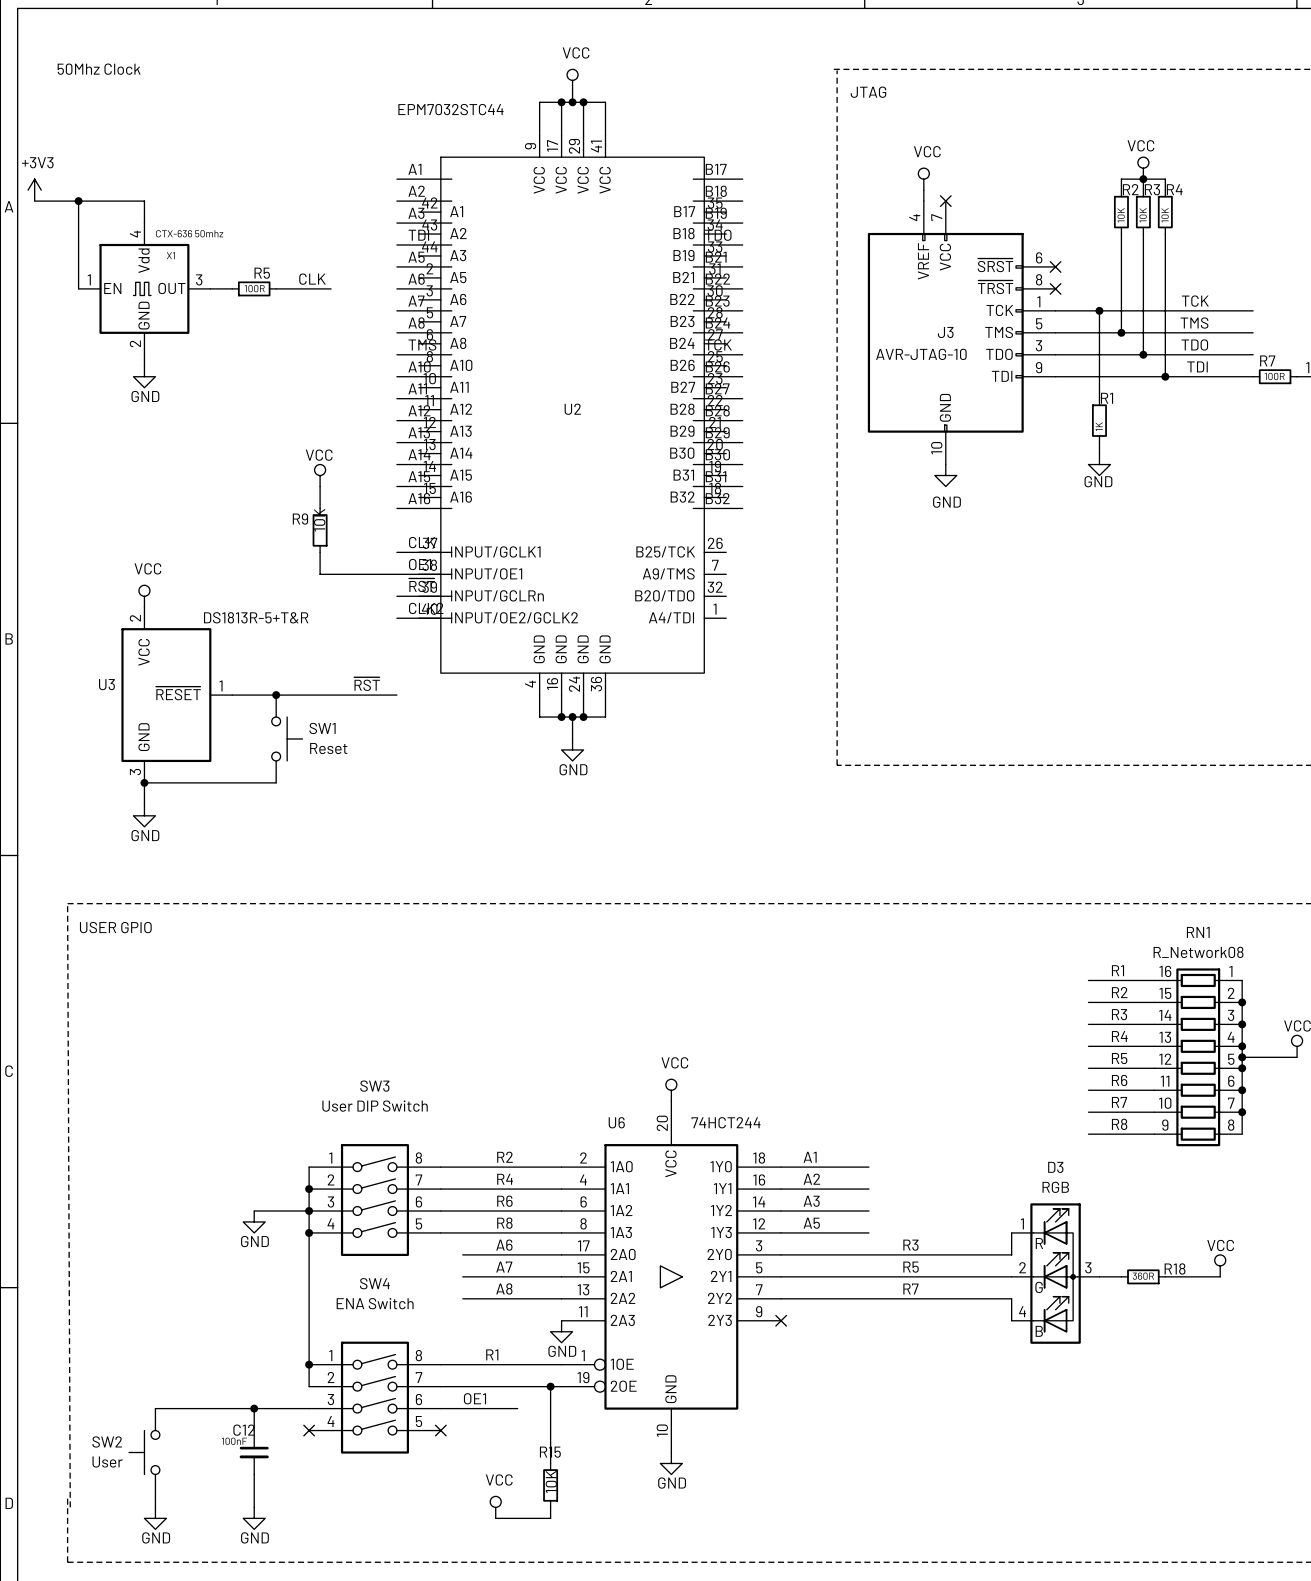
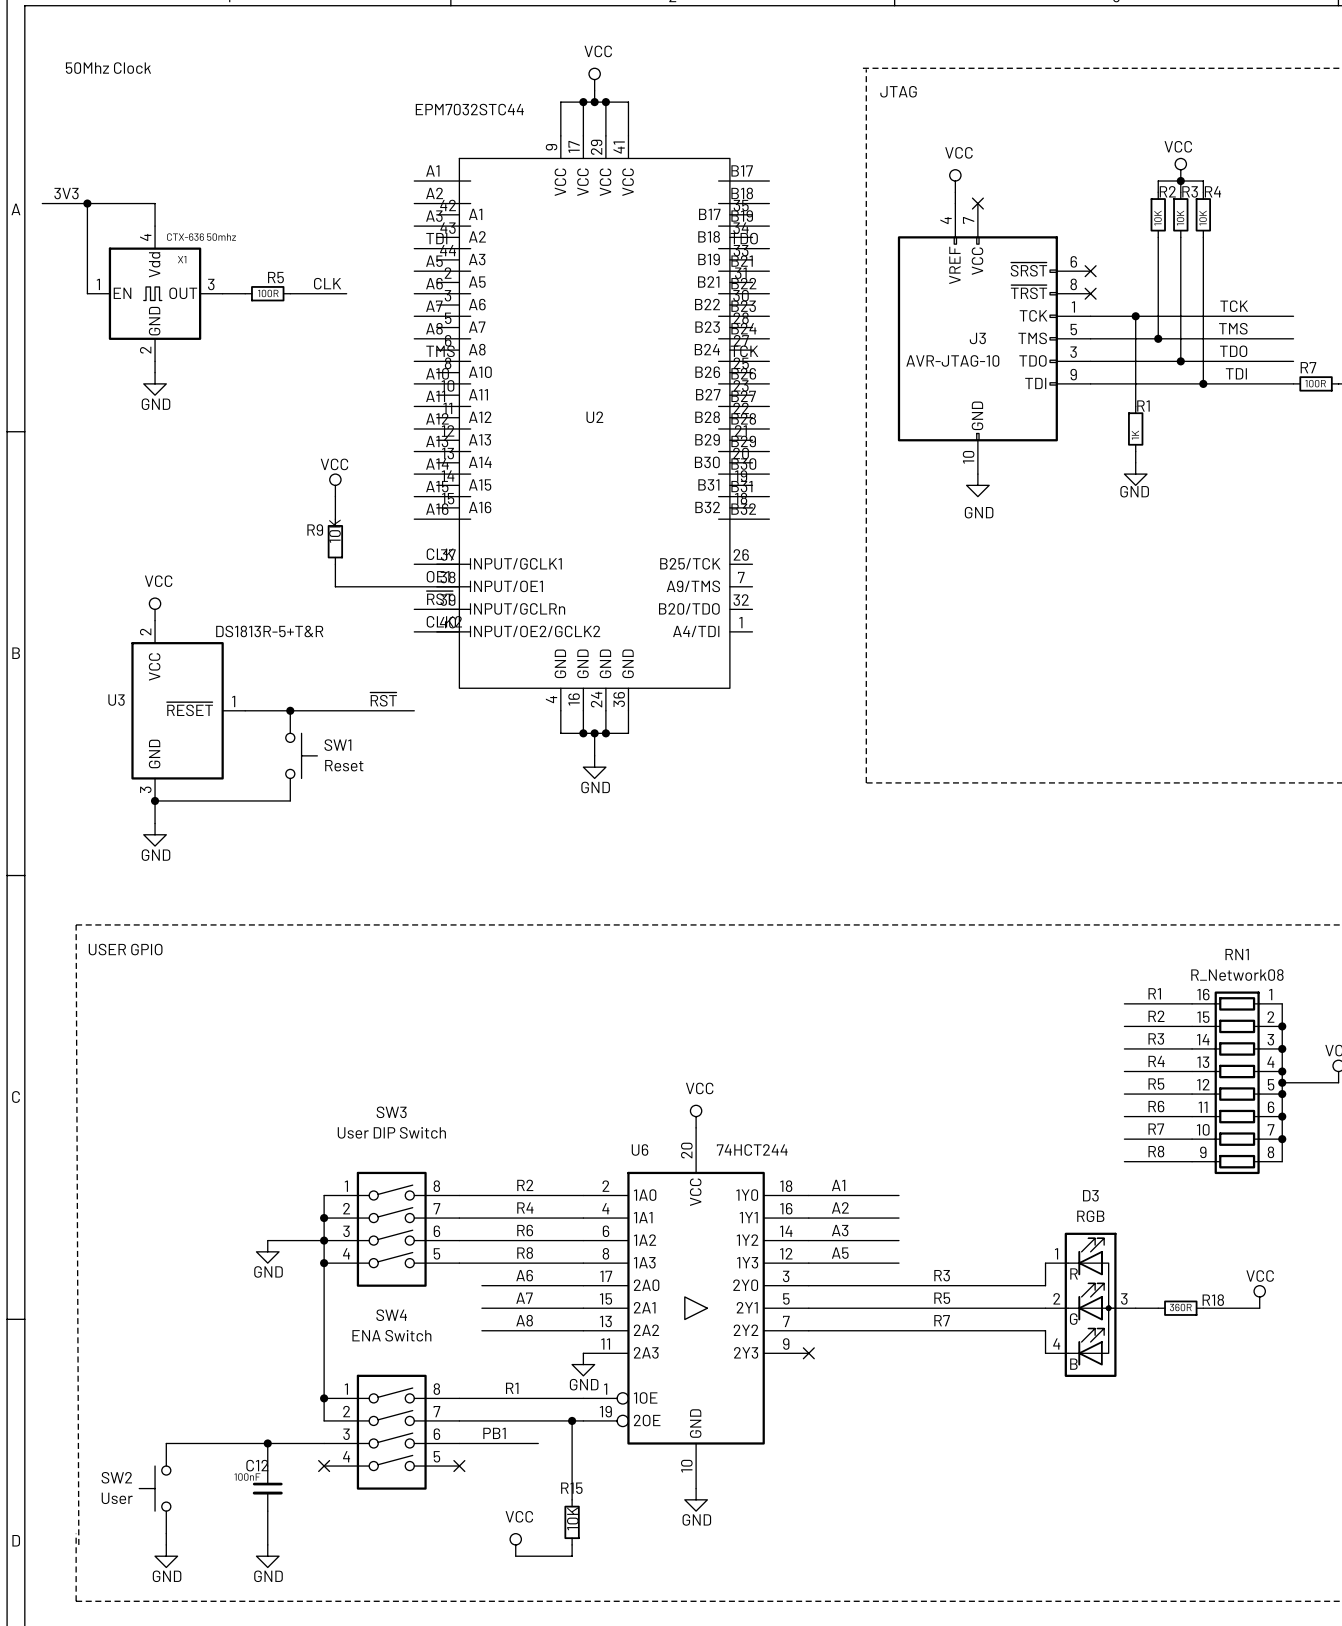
power symbol: +3V3 (34, 190) -> none
label: none -> 3V3 (66, 193)
label: OE1 (474, 1398) -> PB1 (494, 1433)

